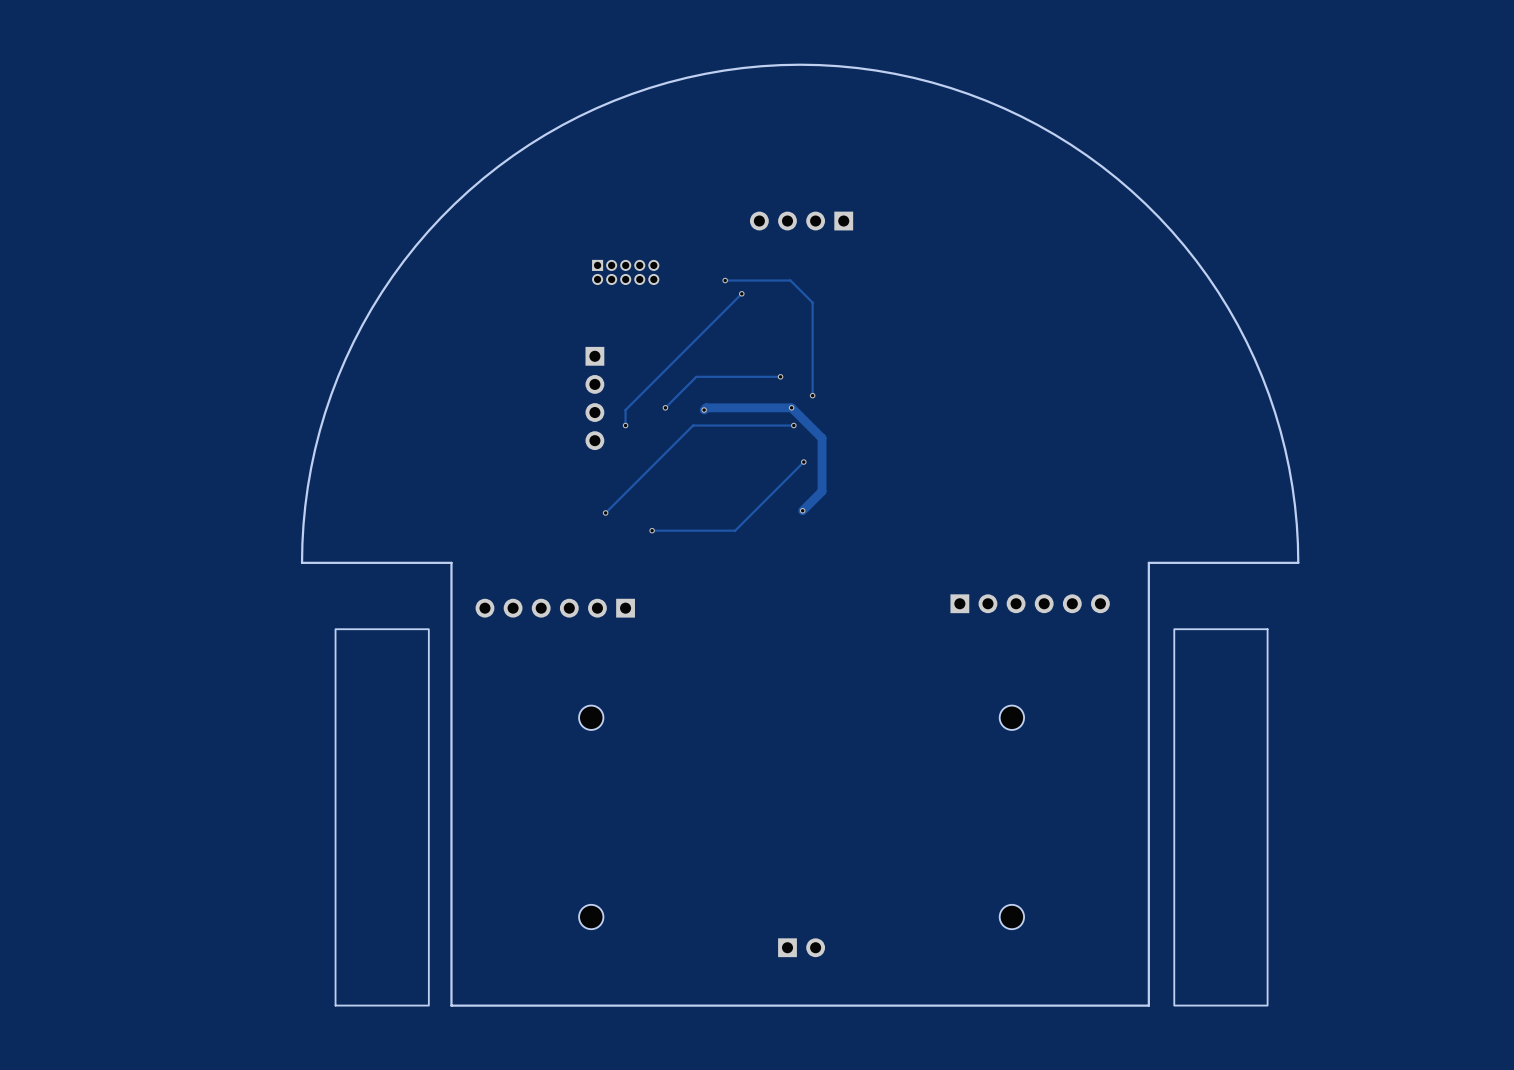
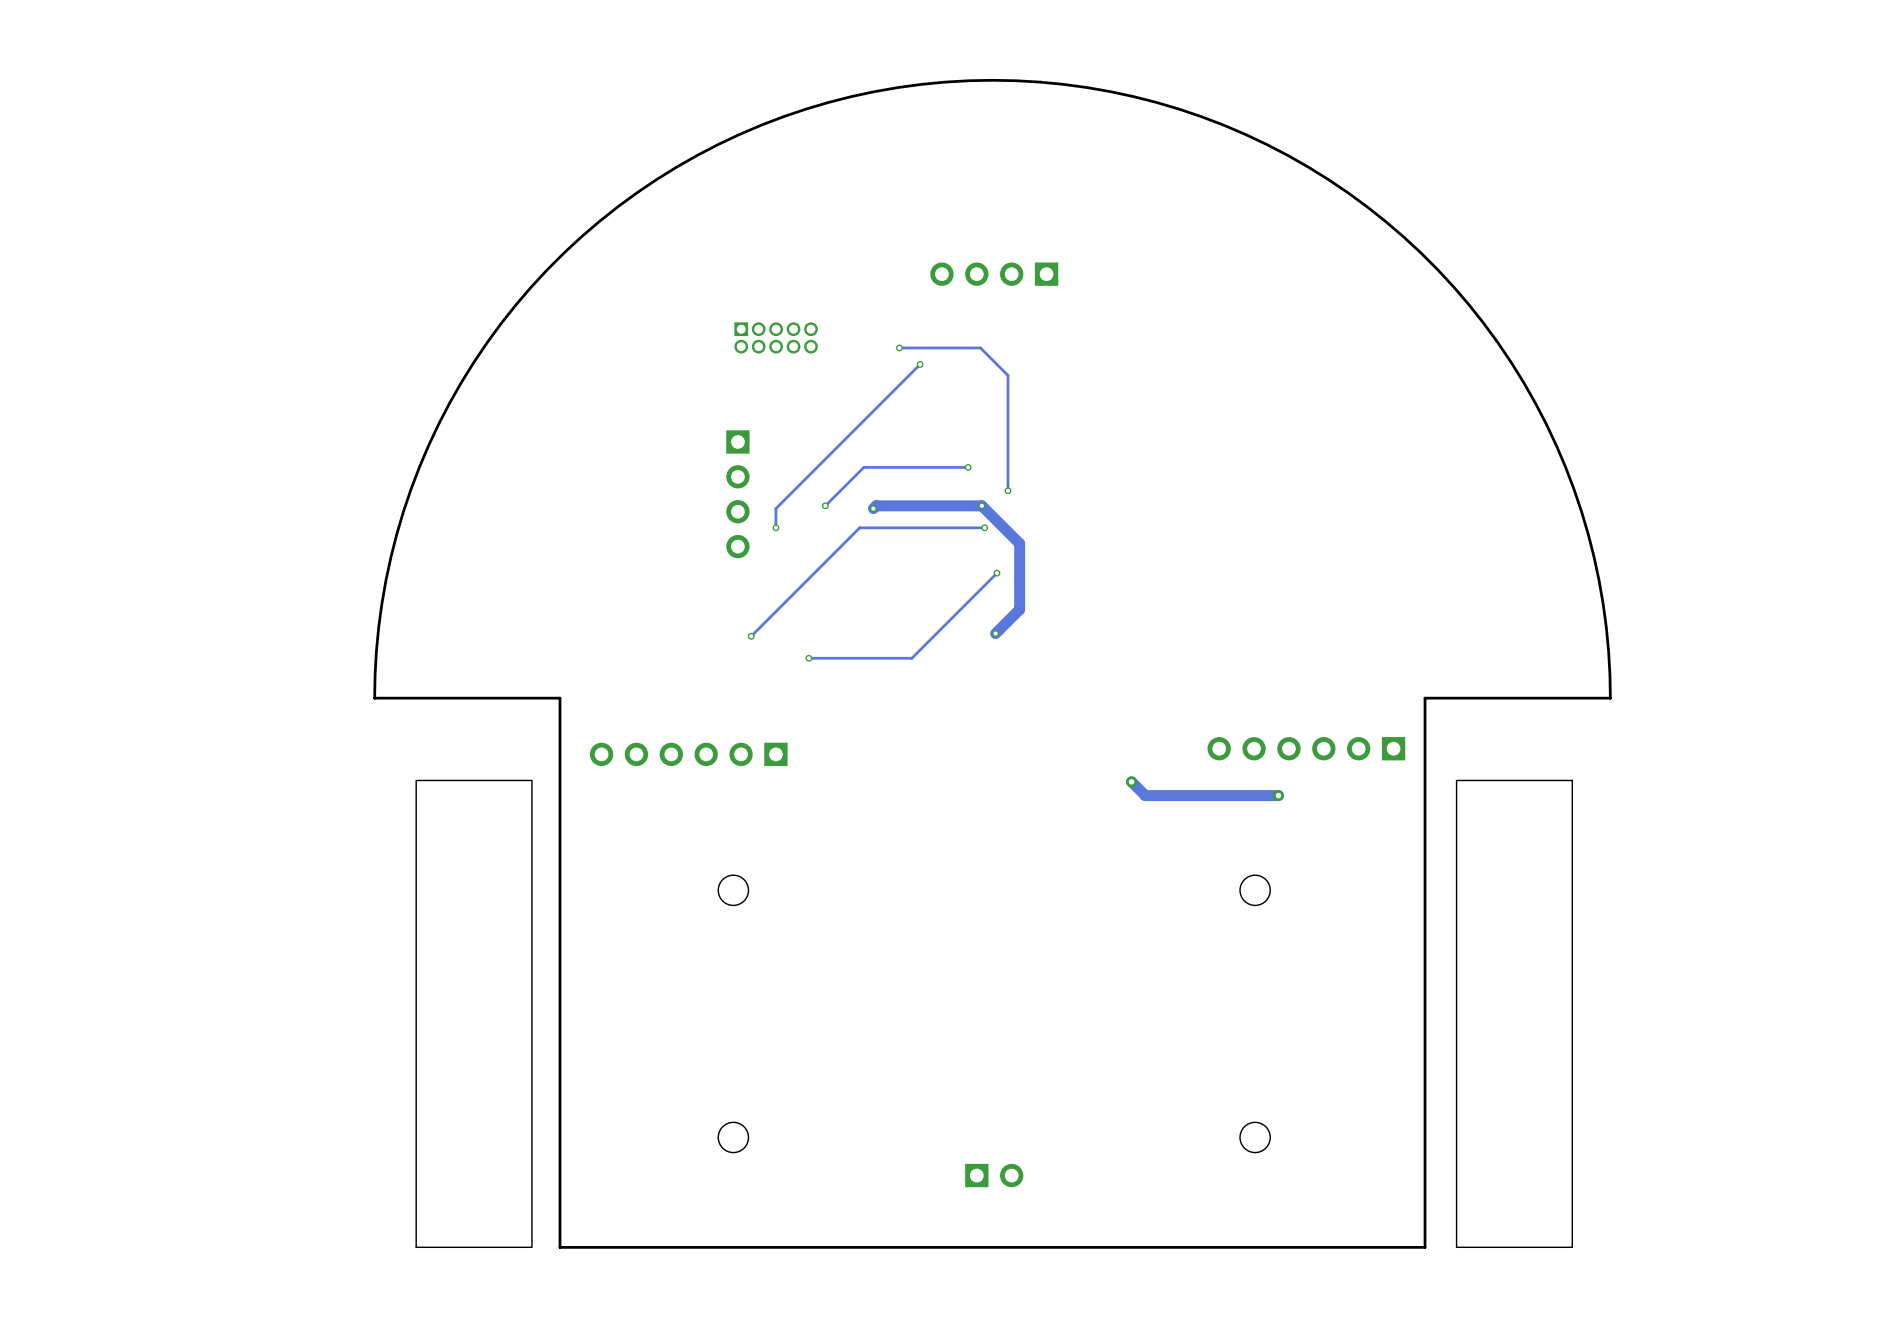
part rotation: 0° (1030, 603) -> 180° (1306, 748)
track: none -> (1131, 781) (1145, 795) (1278, 795)
via: none -> (1131, 781)
via: none -> (1278, 795)

